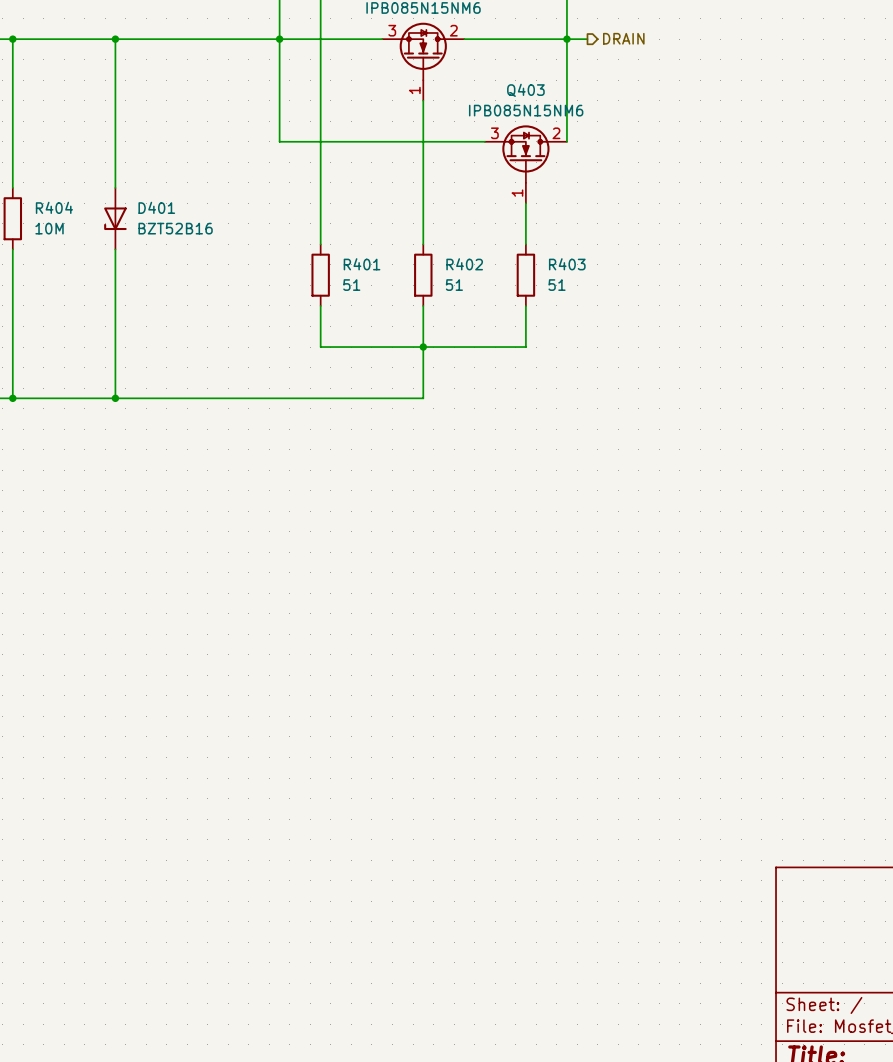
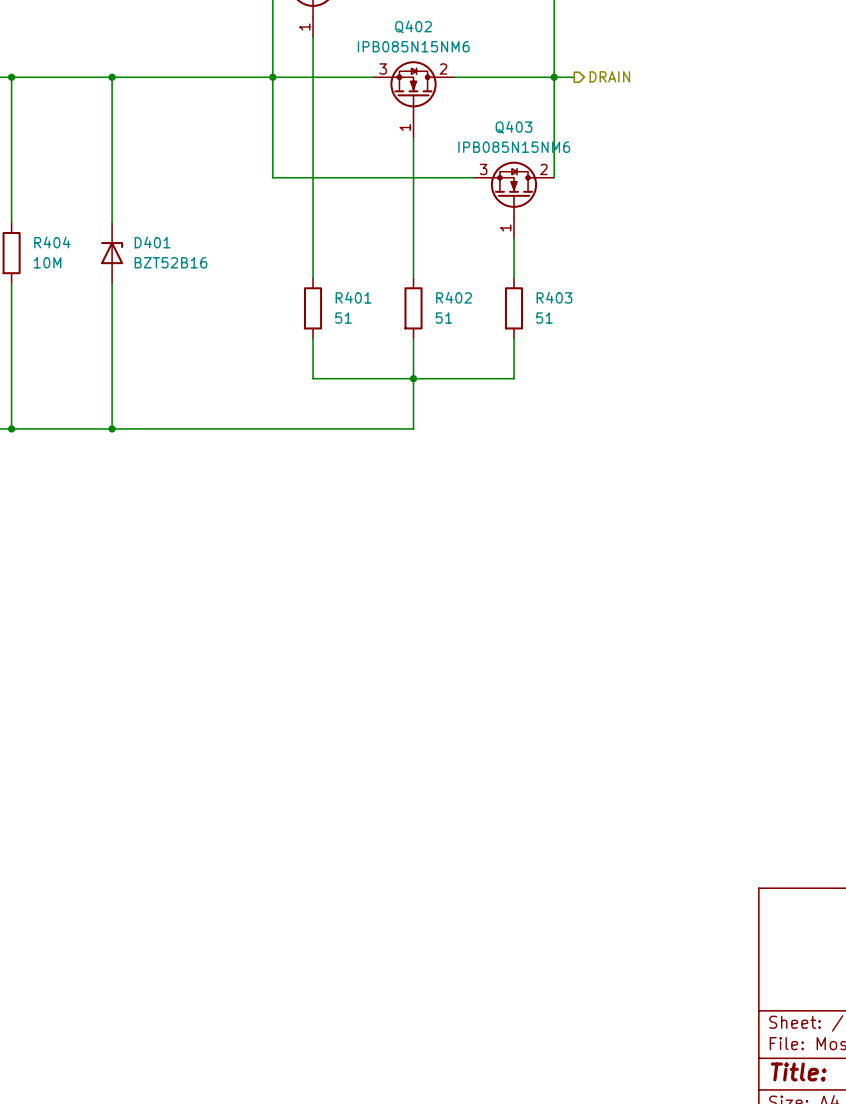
D401 rotation: 0° (115, 218) -> 180° (112, 253)

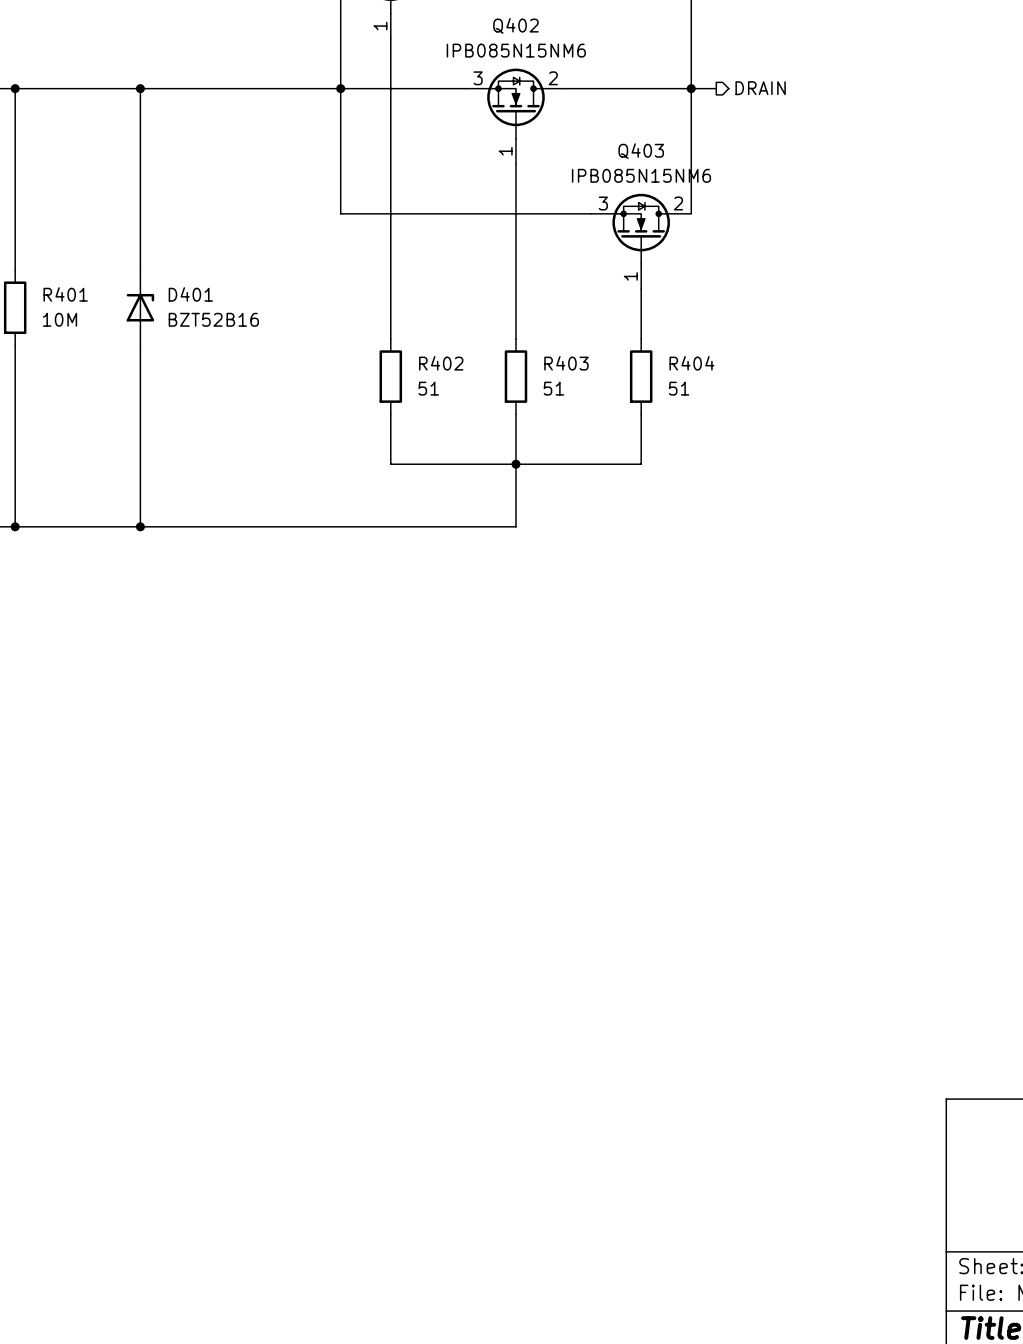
R404 name: R404 (52, 242) -> R401 (65, 294)
R401 name: R401 (353, 297) -> R402 (441, 363)
R402 name: R402 (454, 297) -> R403 (566, 363)
R403 name: R403 (554, 297) -> R404 (691, 363)

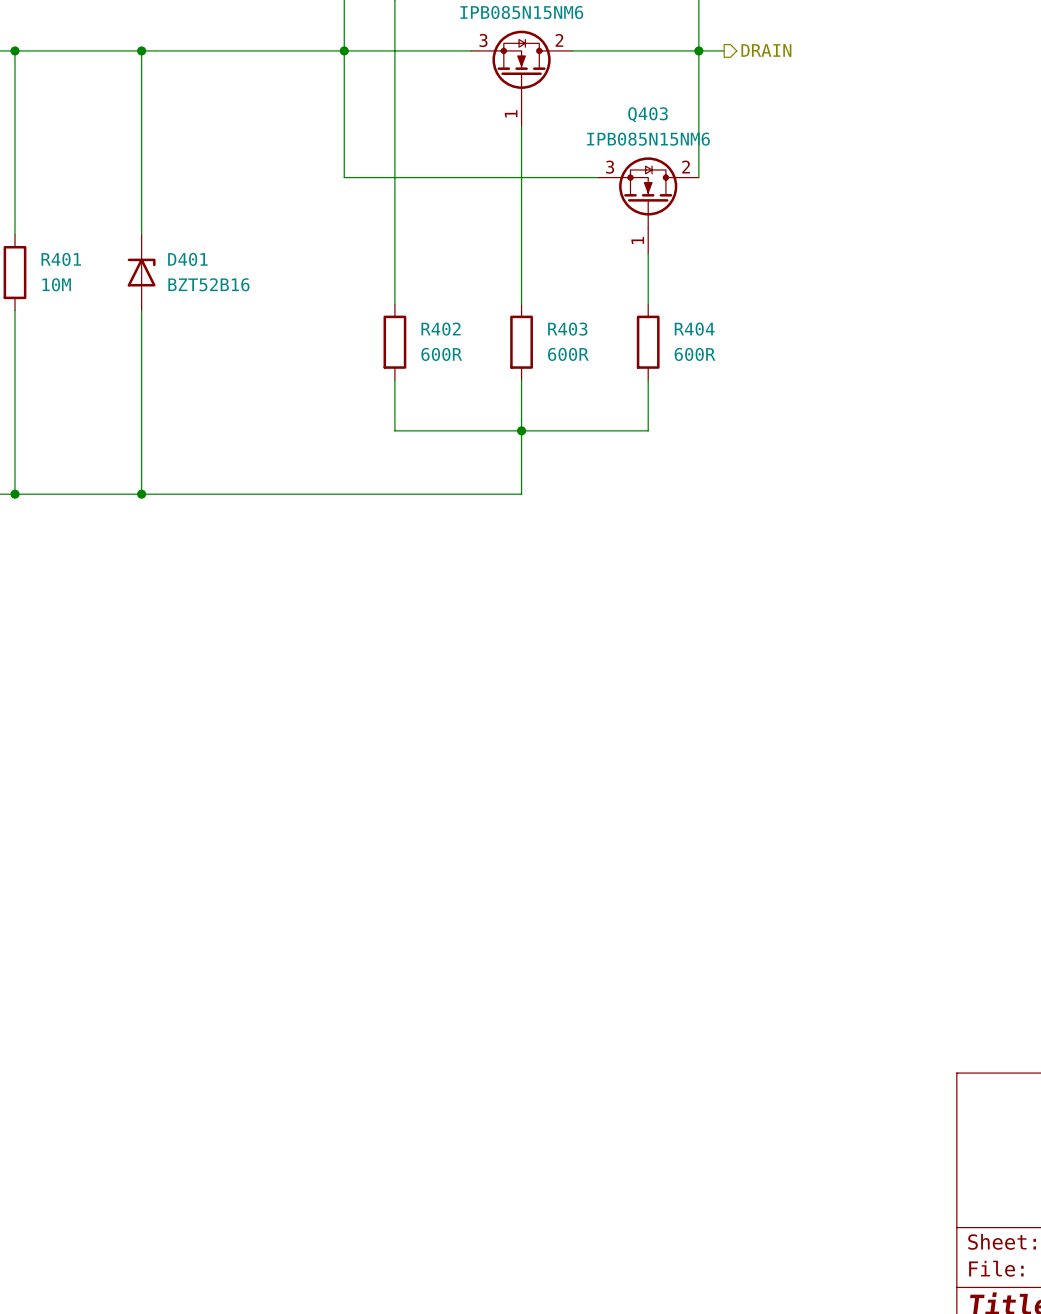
R402 value: 51 (428, 388) -> 600R (441, 354)
R403 value: 51 (553, 388) -> 600R (568, 354)
R404 value: 51 (679, 388) -> 600R (695, 354)

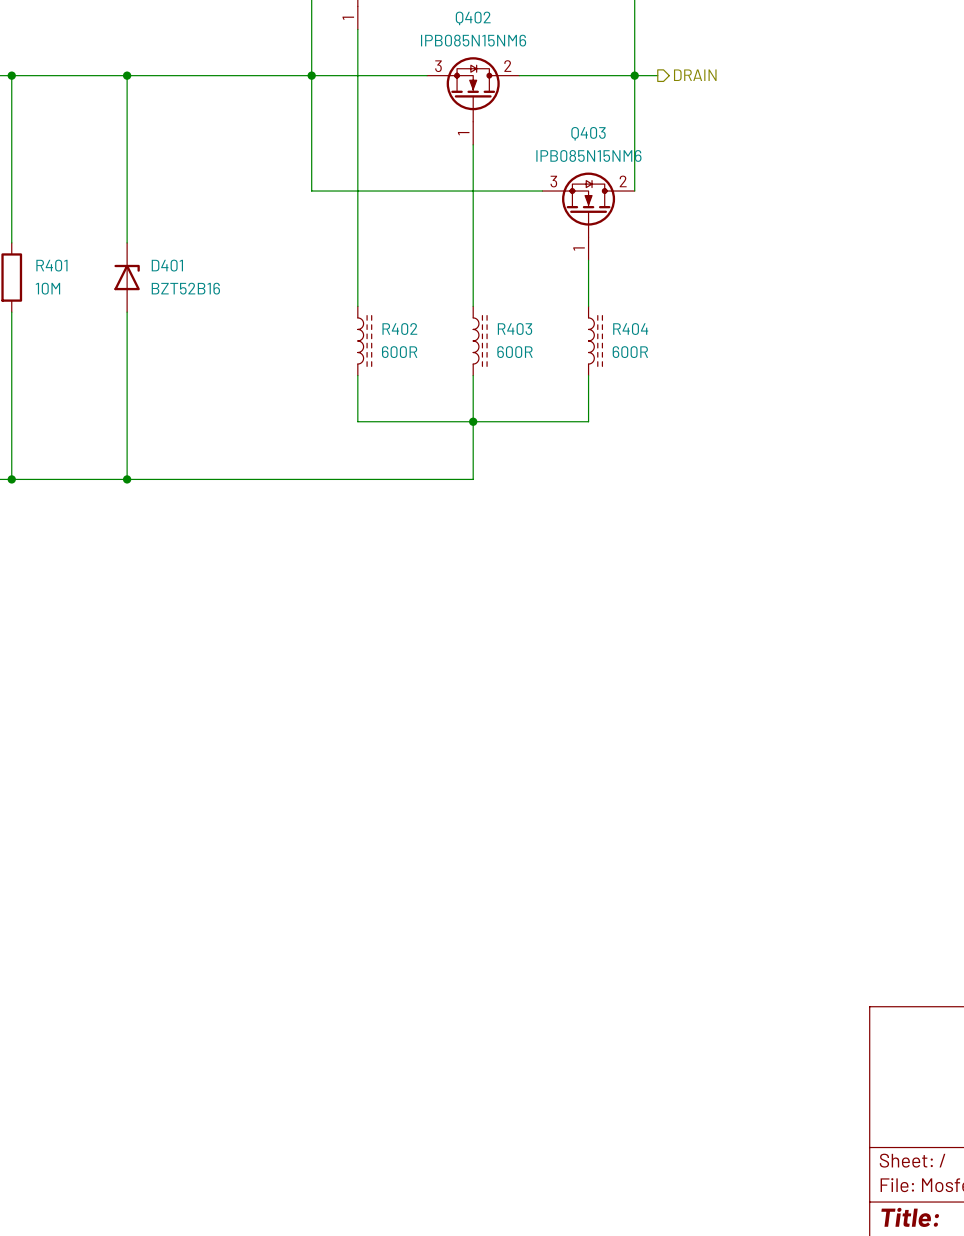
R402 symbol: [383, 304, 407, 381] -> [357, 306, 372, 376]
R403 symbol: [510, 304, 533, 381] -> [473, 306, 488, 376]
R404 symbol: [636, 304, 660, 381] -> [588, 306, 603, 376]

